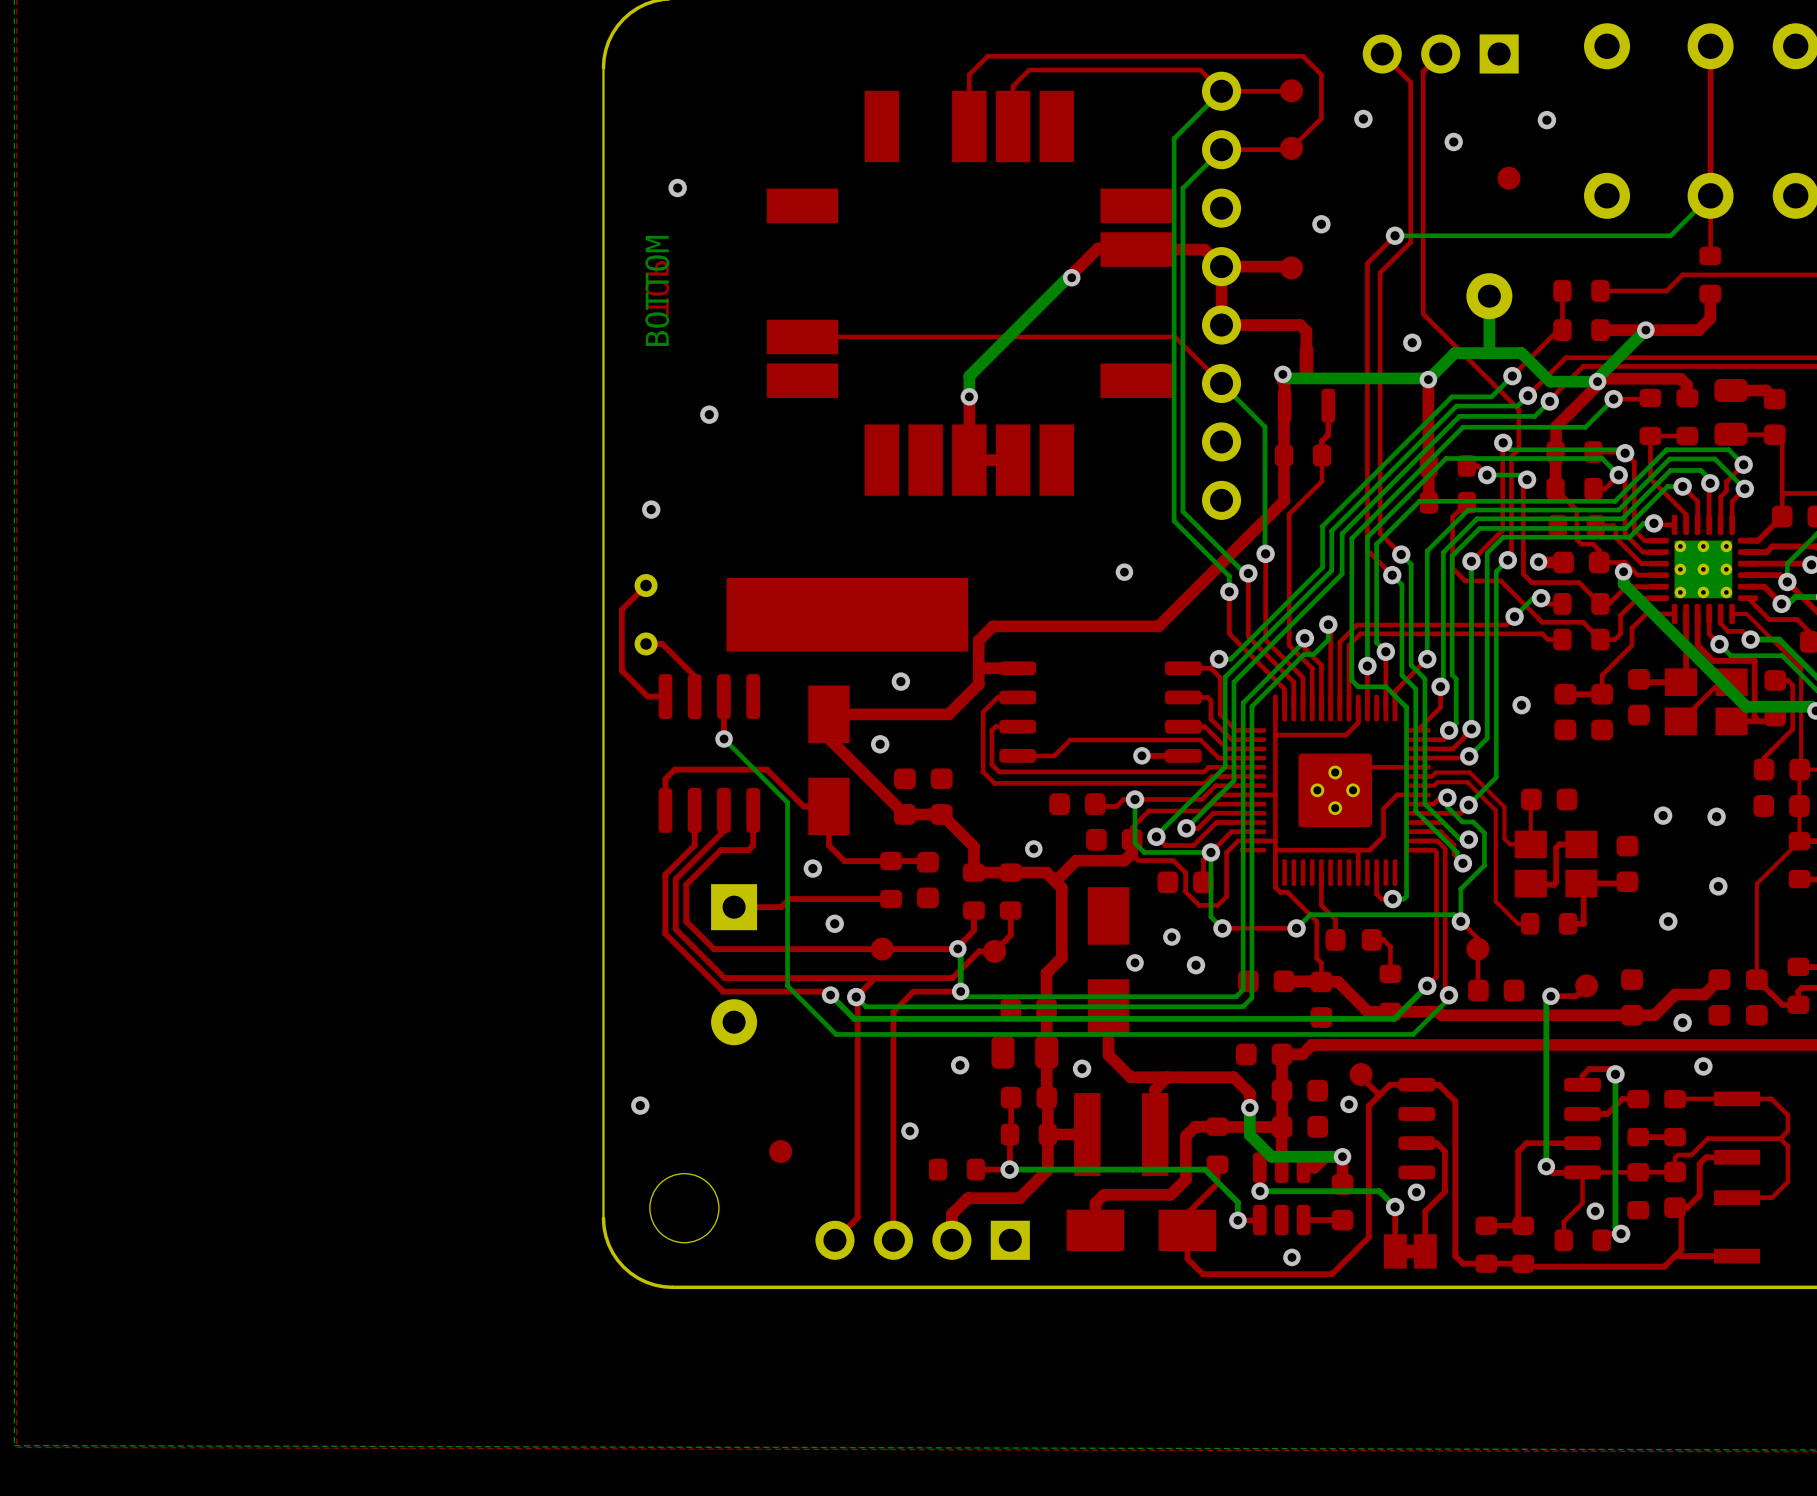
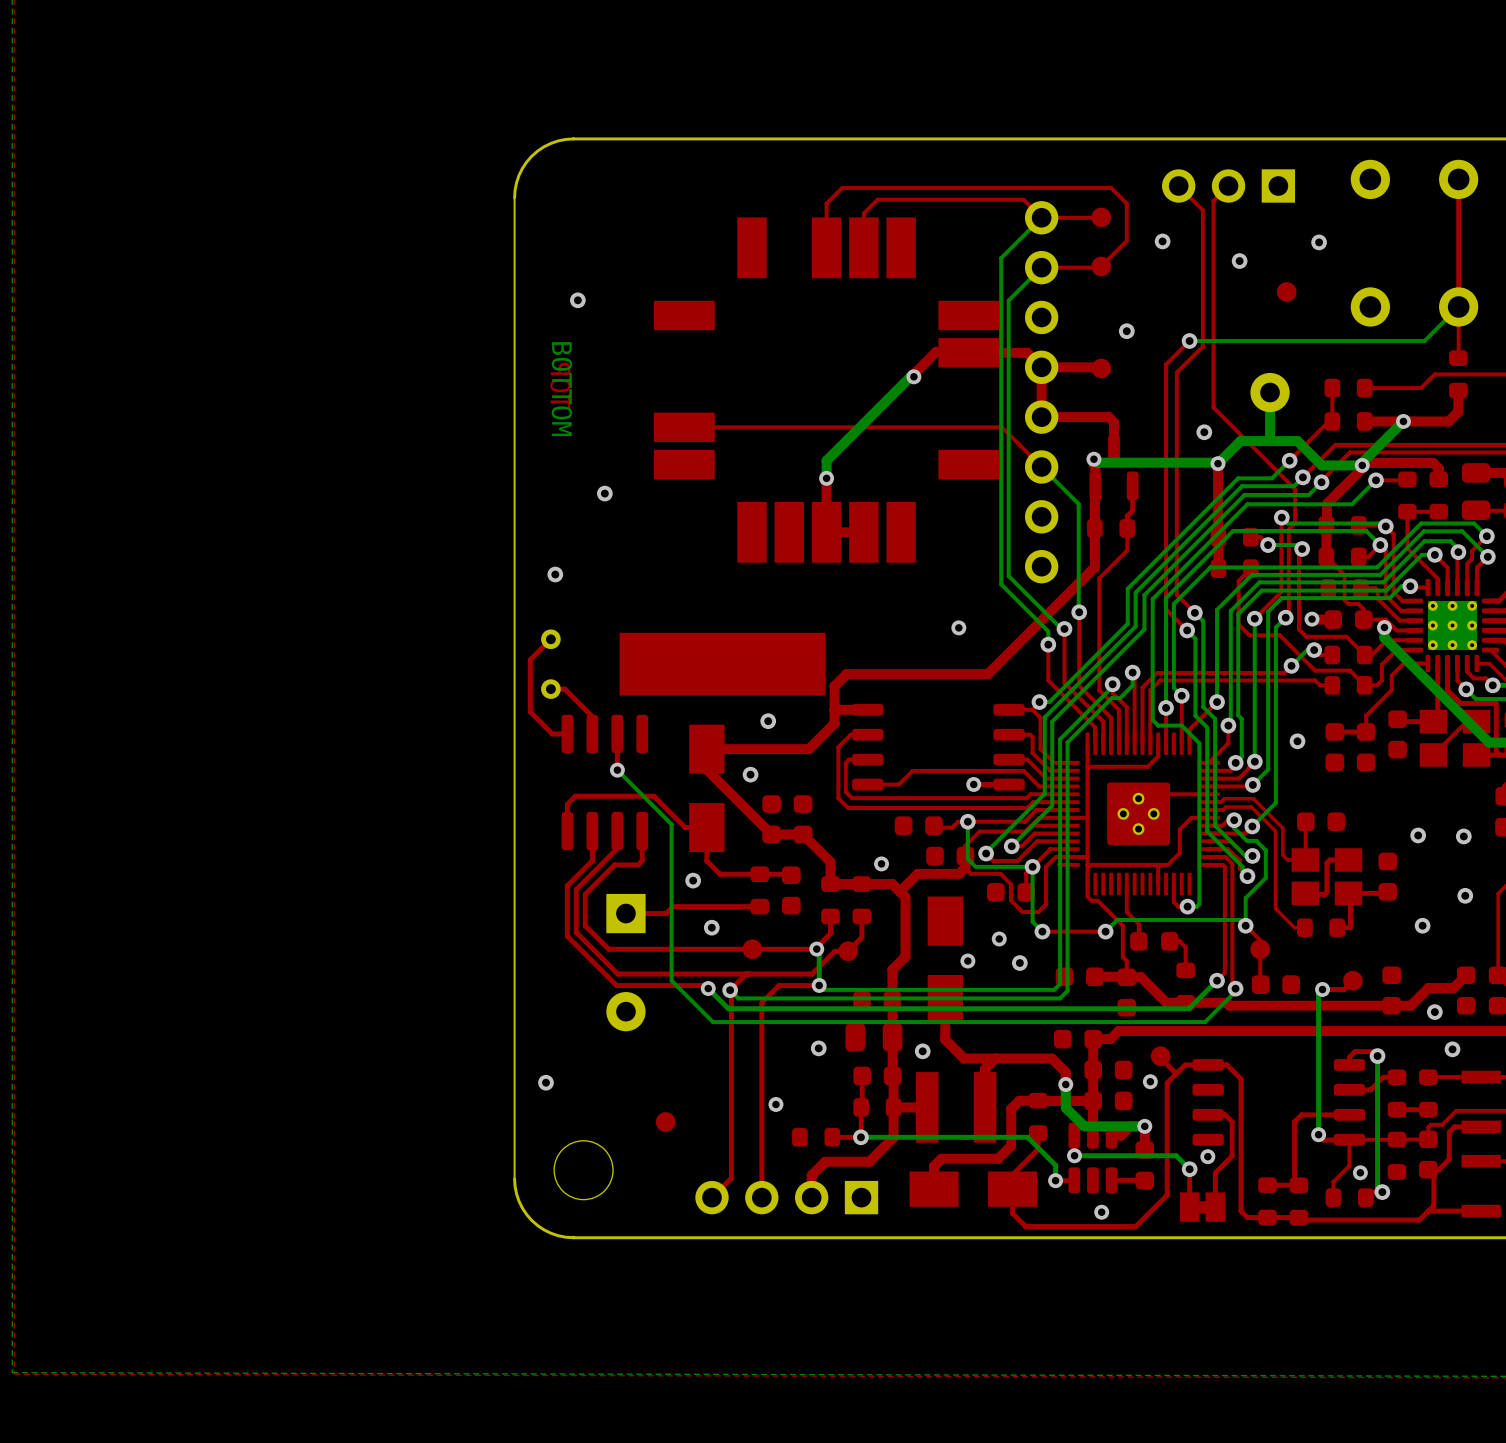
text rotation: 0° (657, 290) -> 180° (561, 389)

